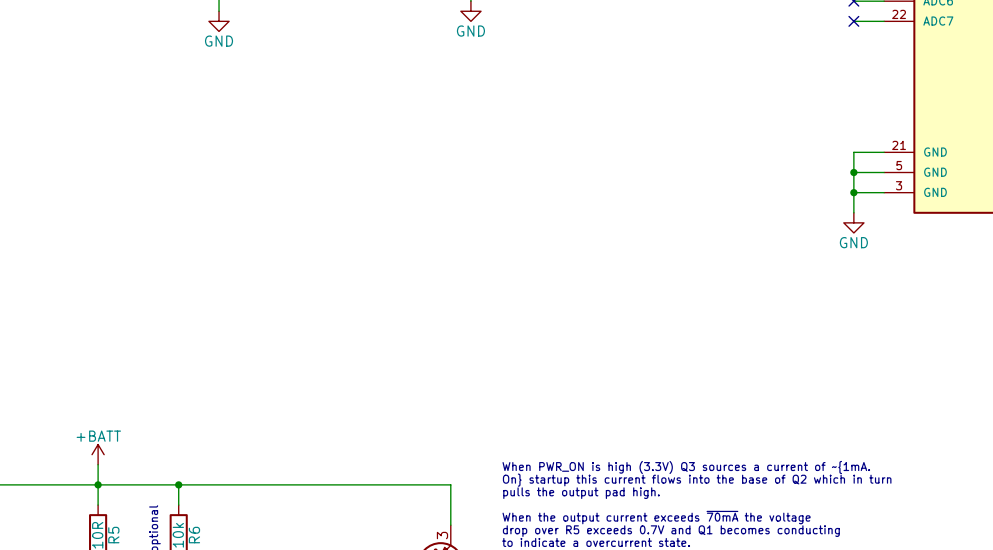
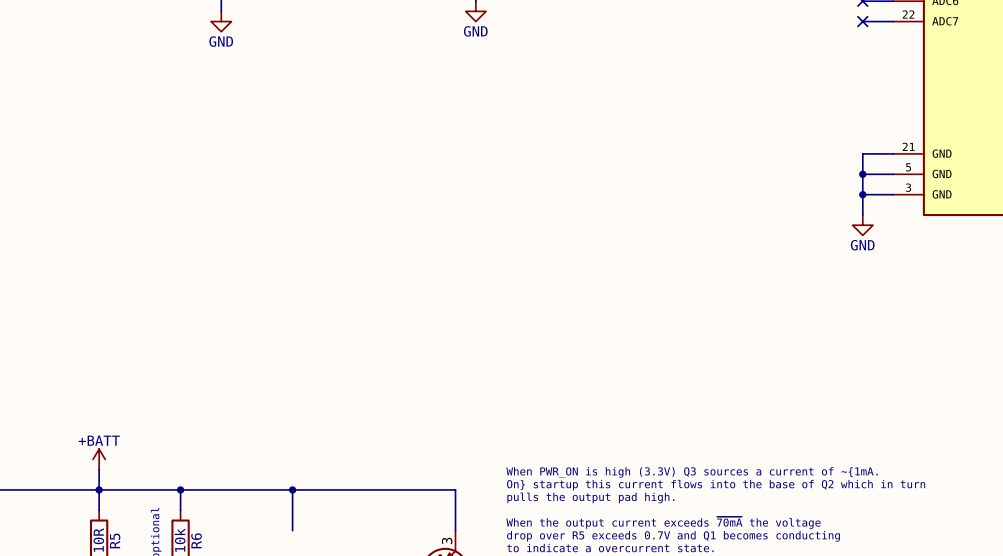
wire: none -> (292, 489) (292, 530)
junction: none -> (292, 489)

